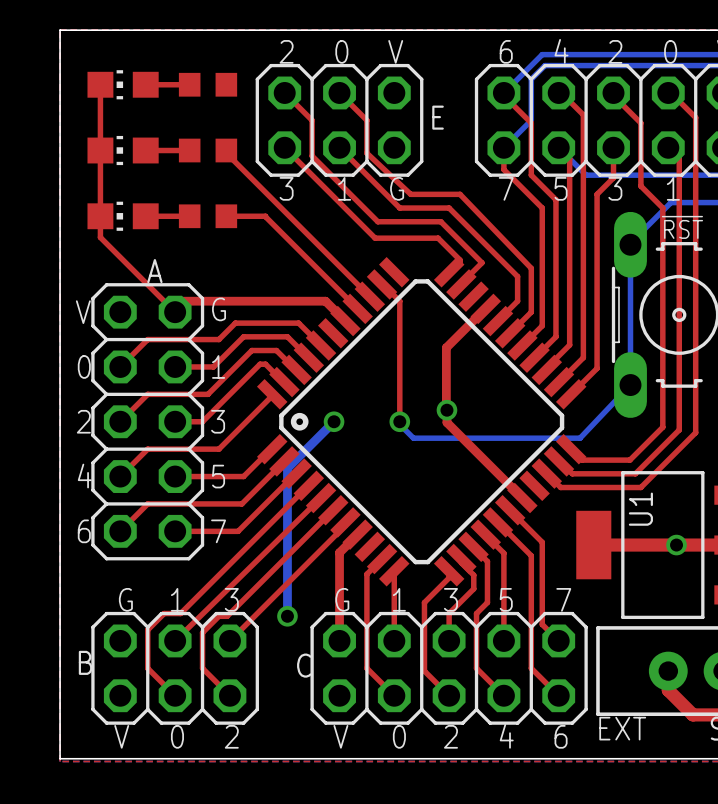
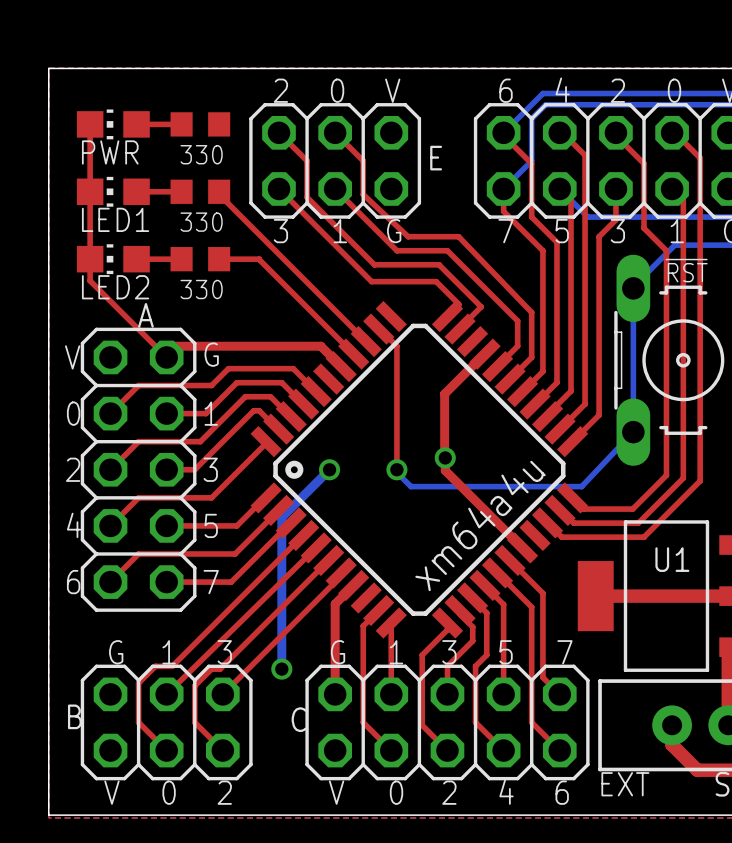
part value: none -> PWR (110, 152)
part value: none -> 330 (201, 154)
part value: none -> LED1 (115, 219)
part value: none -> 330 (201, 222)
part value: none -> LED2 (115, 287)
part value: none -> 330 (201, 289)
part value: none -> xm64a4u (480, 525)
U1 name rotation: 0° (640, 509) -> 90° clockwise (672, 559)
via: (676, 545) -> none

